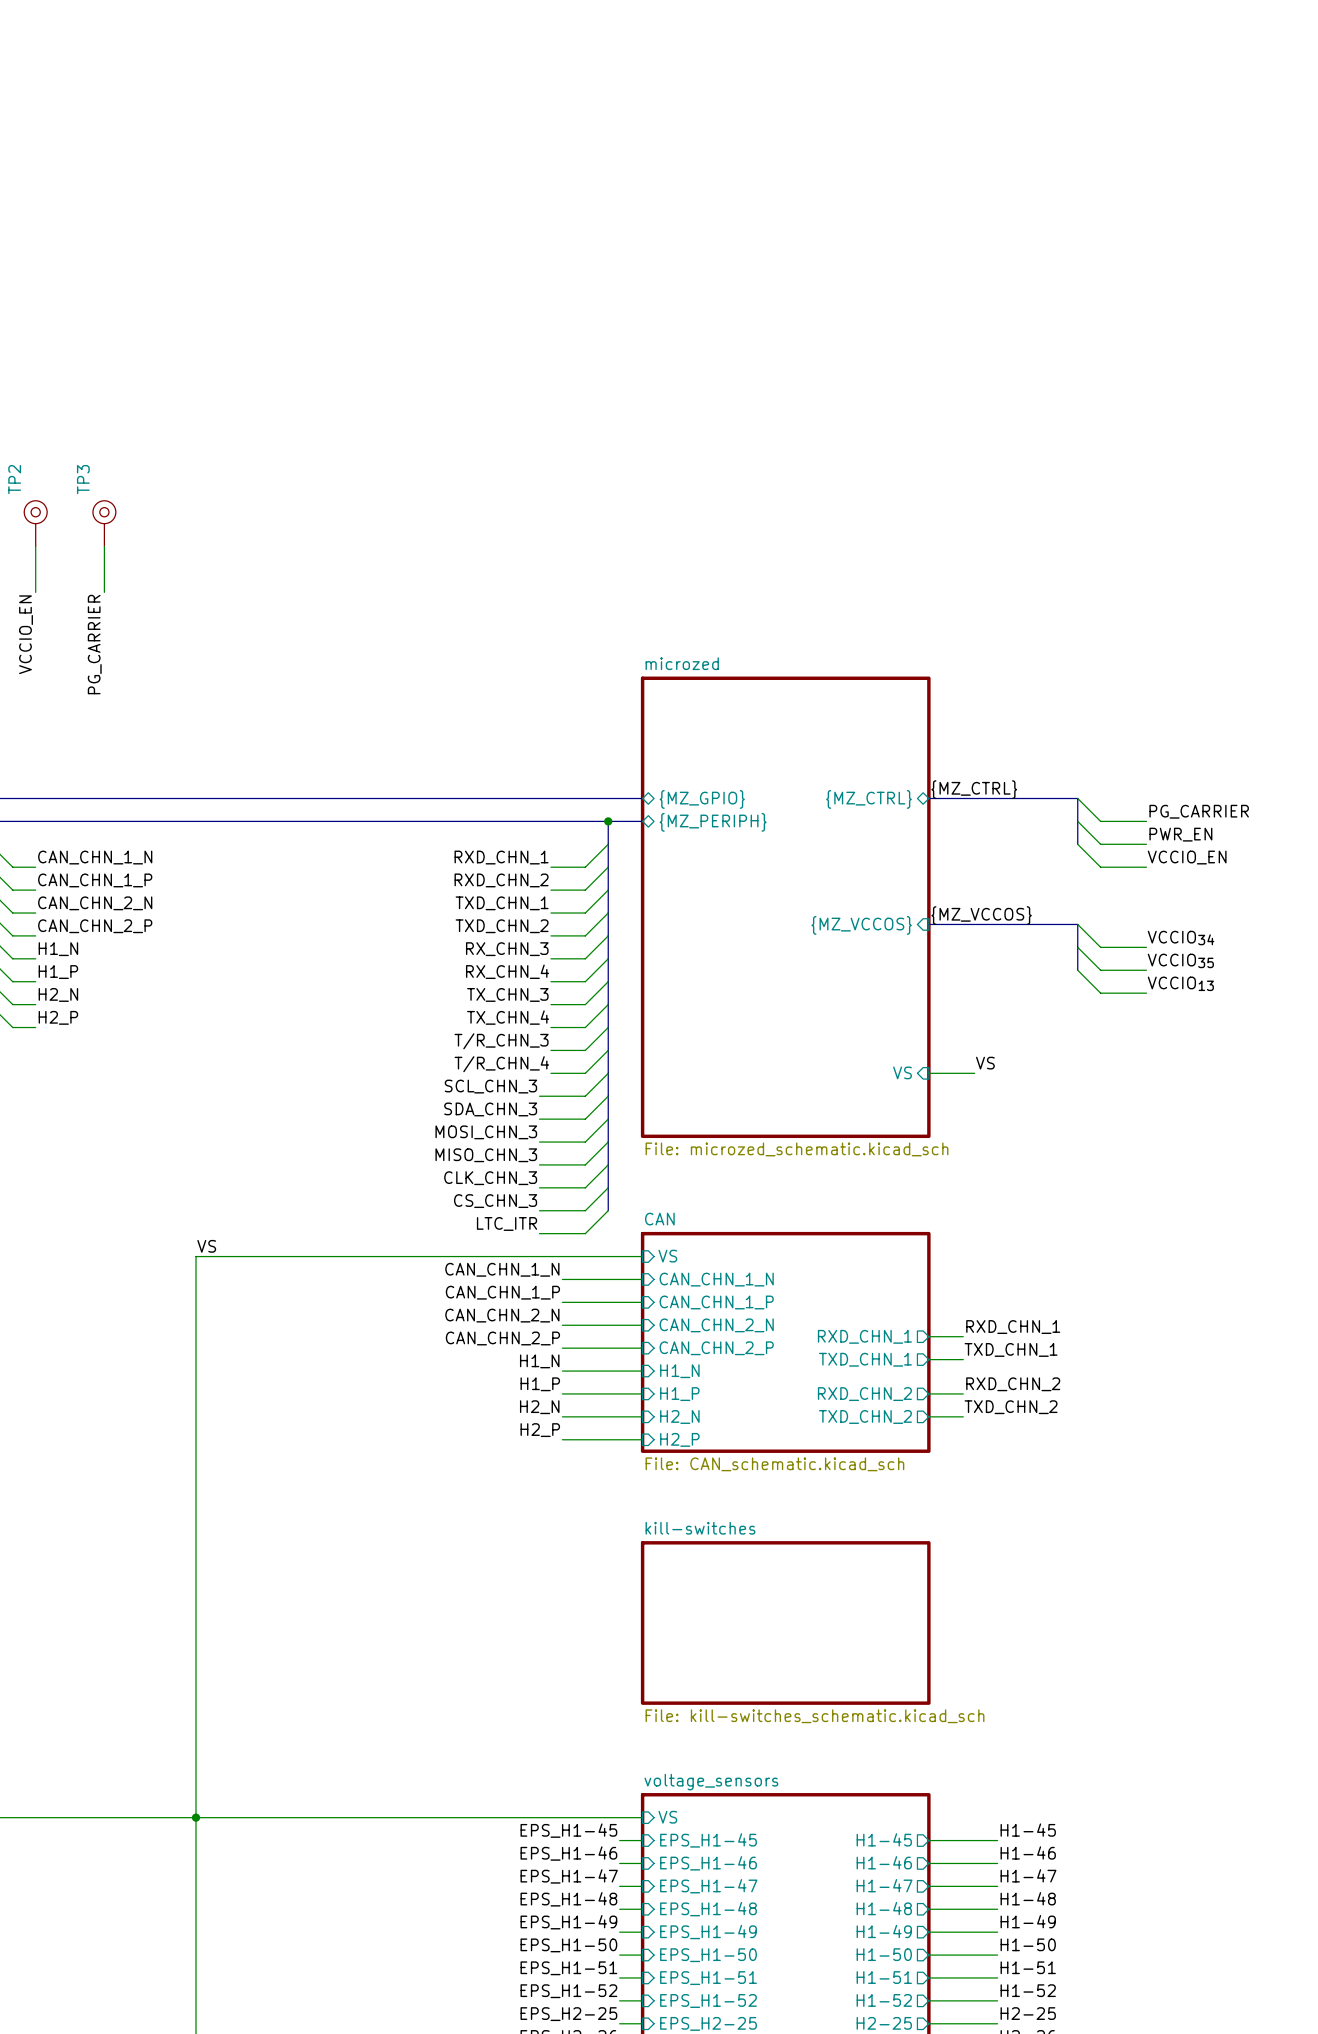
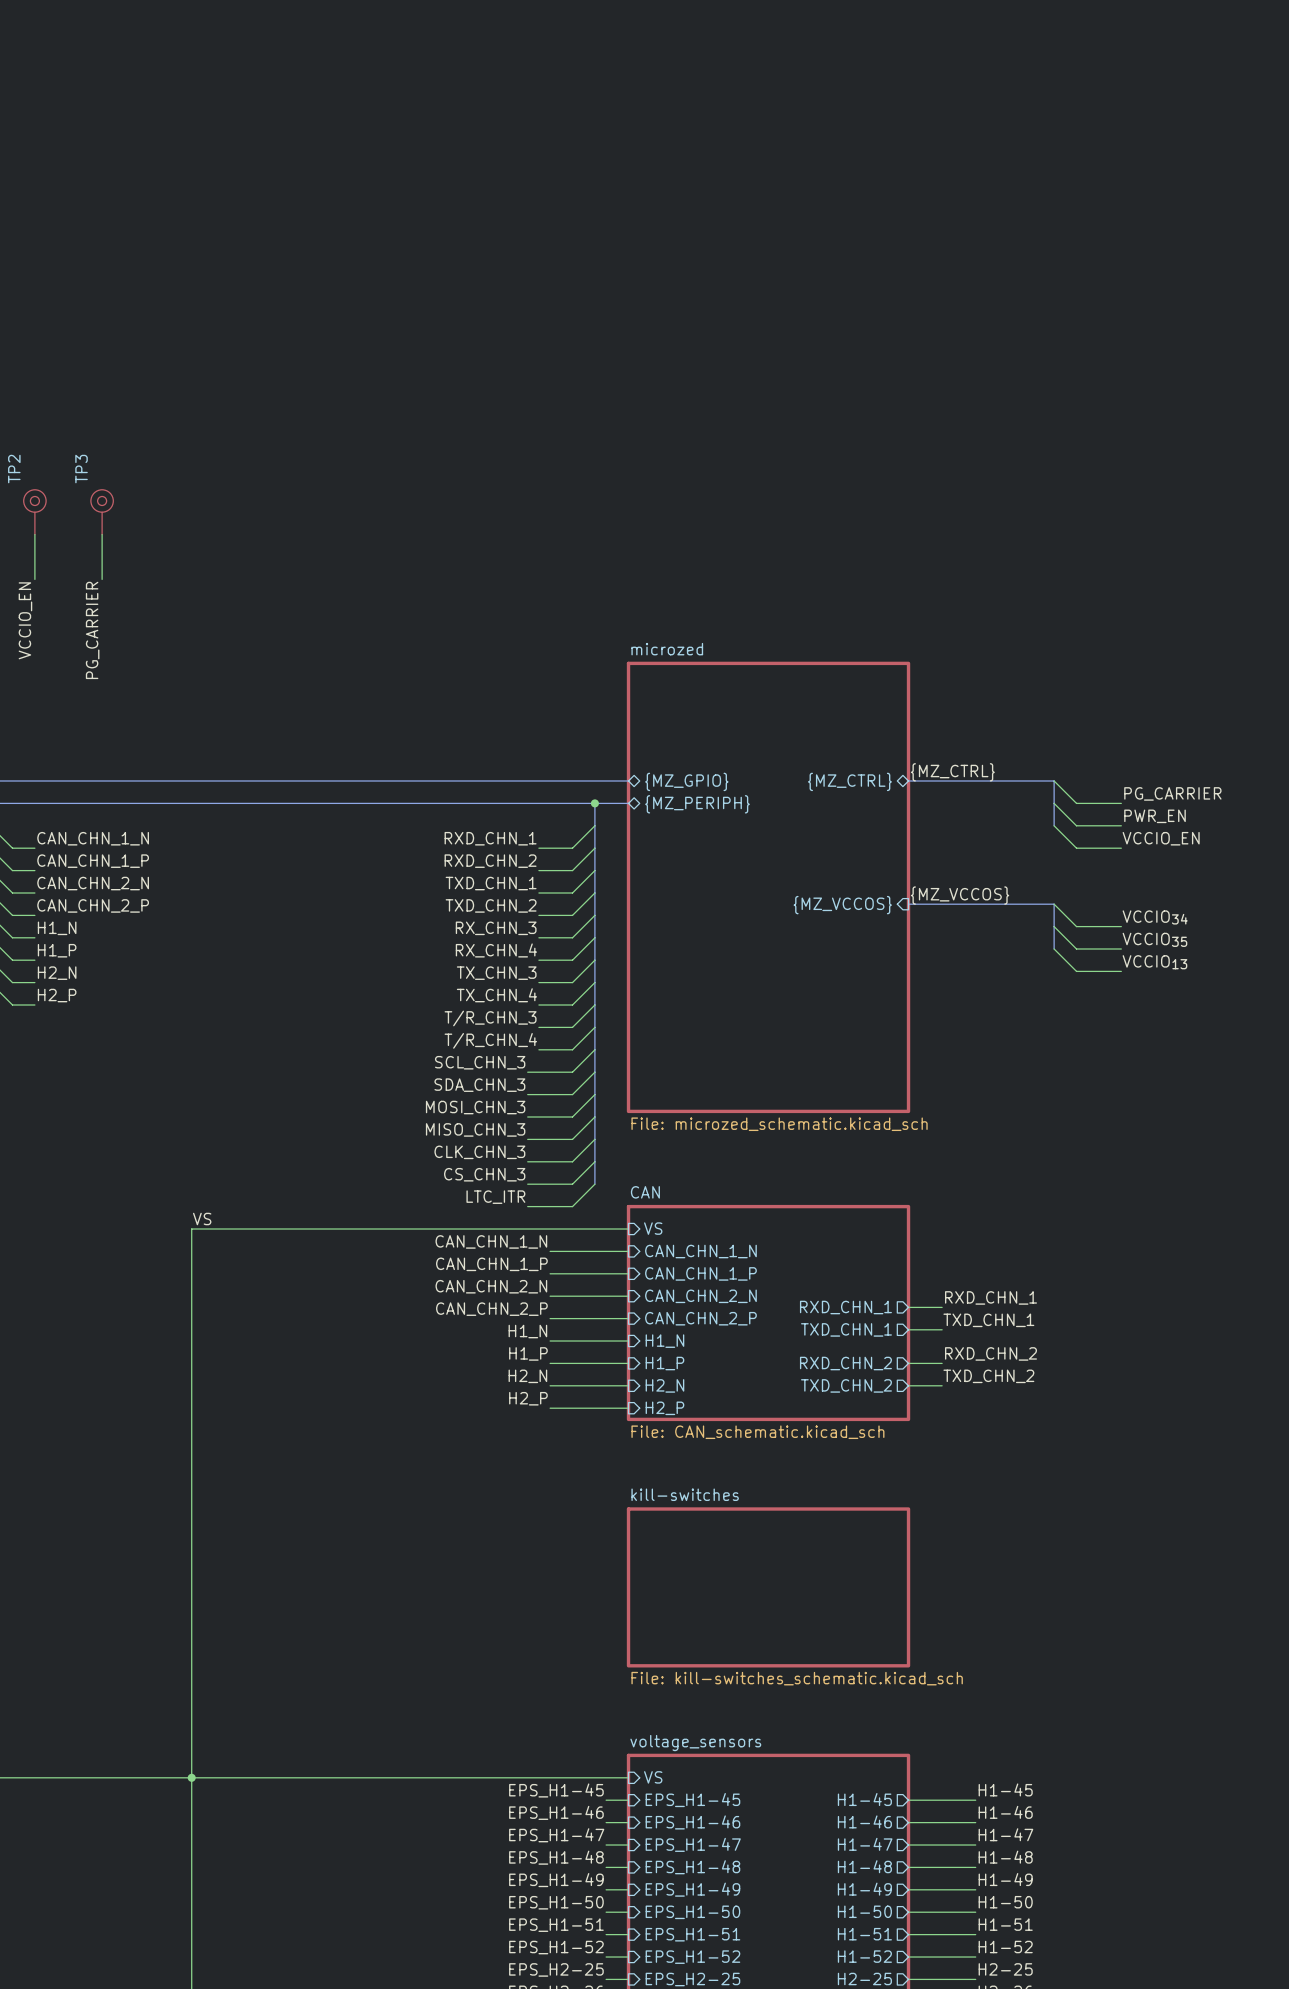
label: VS (985, 1063) -> none
sheet pin: VS (902, 1072) -> none
wire: (928, 1073) (974, 1073) -> none

